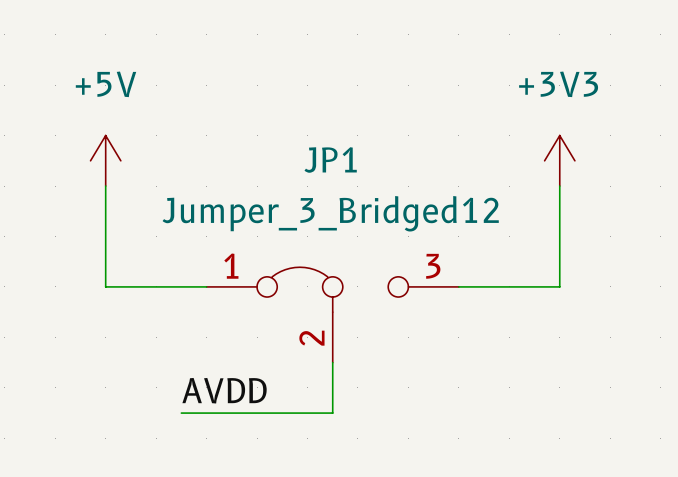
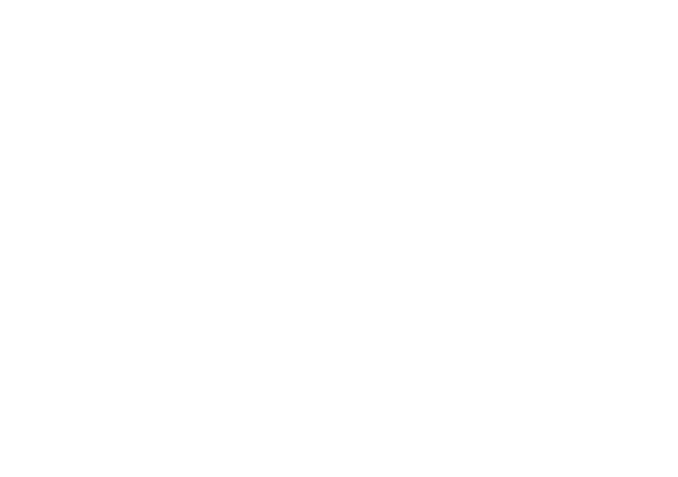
power symbol: +5V (105, 160) -> none
power symbol: +3V3 (559, 160) -> none
wire: (105, 186) (105, 286) (206, 286) -> none
wire: (559, 186) (559, 286) (458, 286) -> none
JP1: Jumper_3_Bridged12 (332, 314) -> none
wire: (332, 362) (332, 413) (181, 413) -> none
label: AVDD (224, 390) -> none

